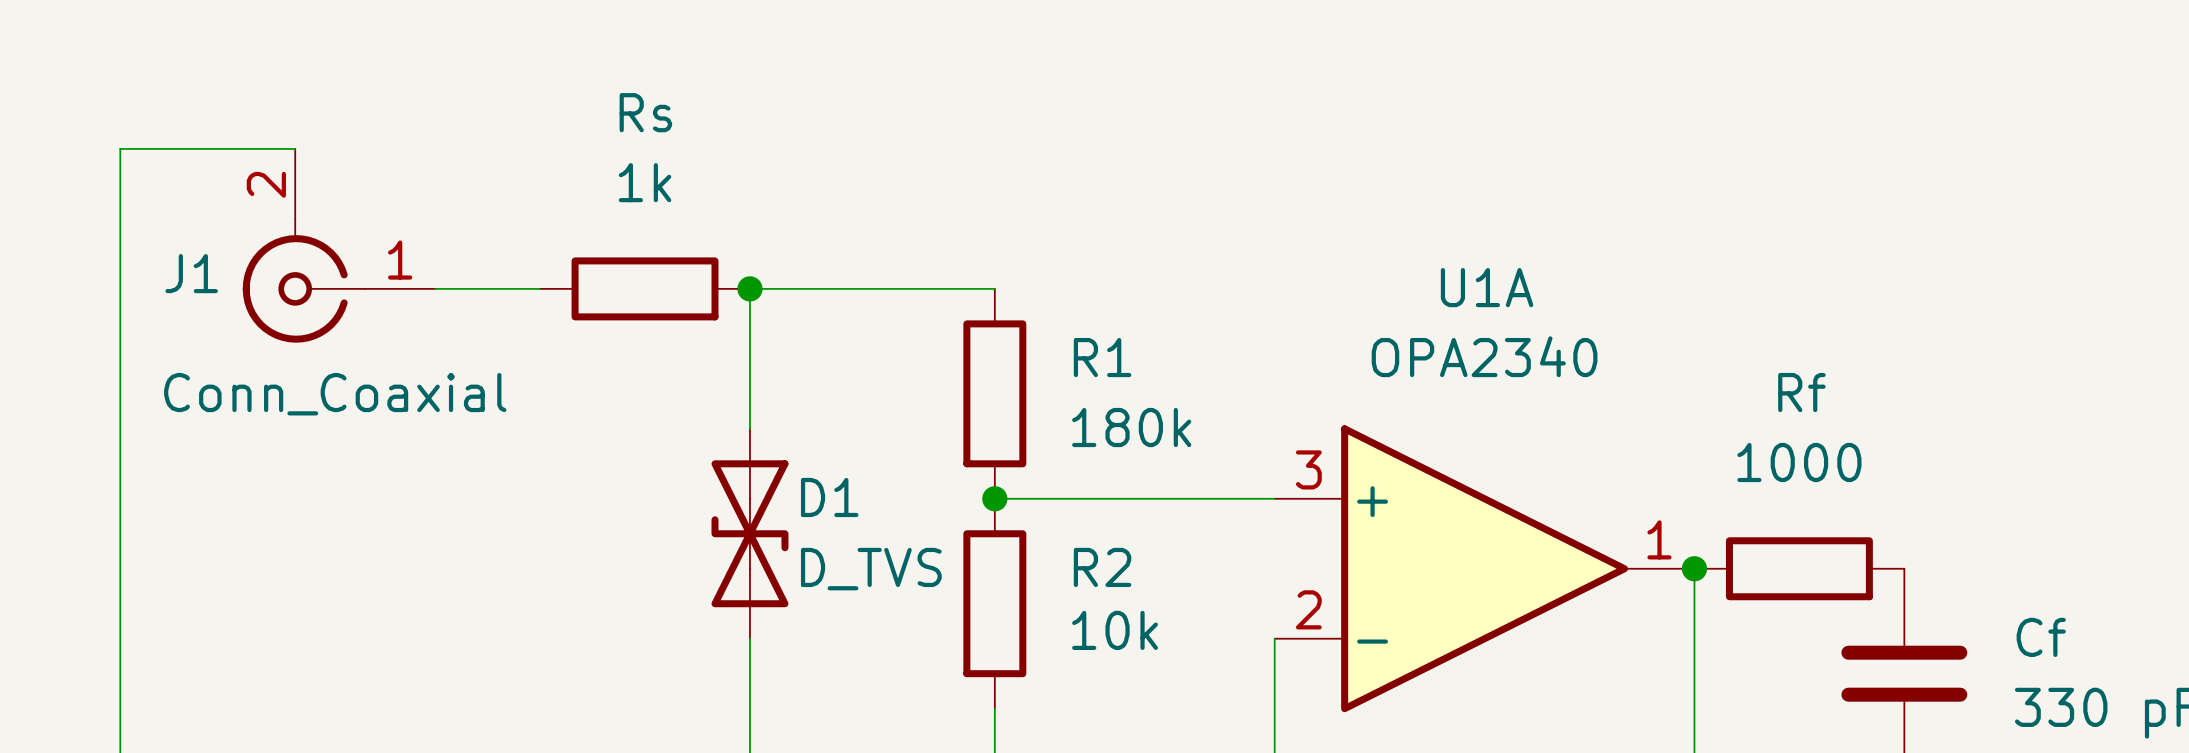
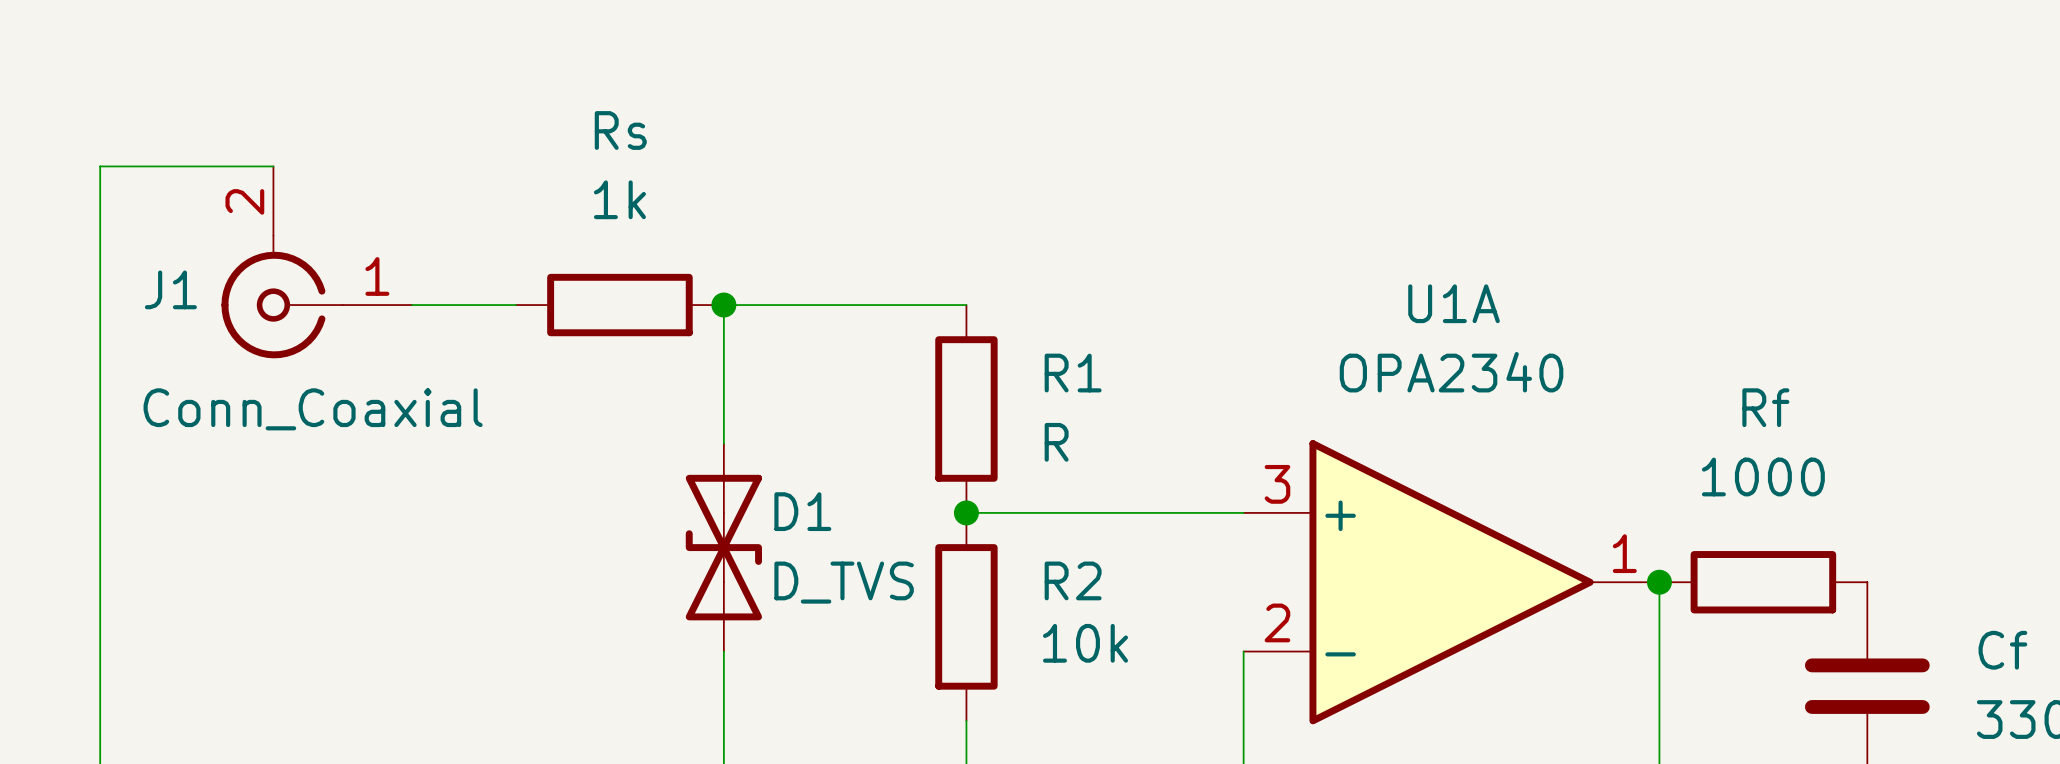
R1 value: 180k (1131, 427) -> R (1056, 442)

